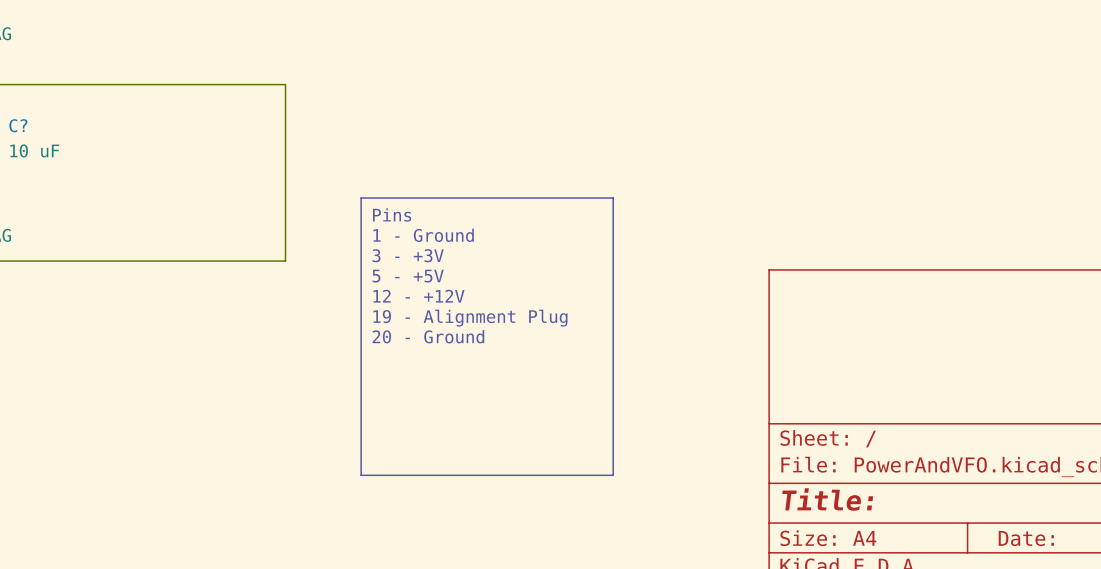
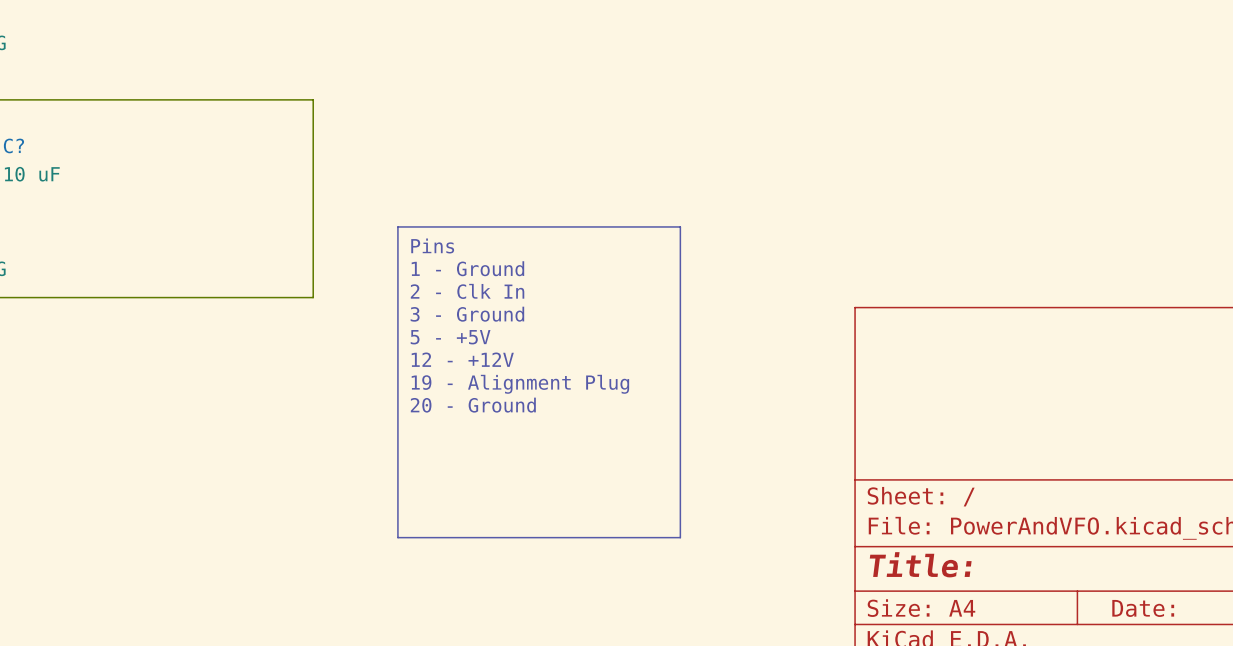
text: 3 - +3V (408, 255) -> 2 - Clk In (467, 291)
text: 5 - +5V (408, 276) -> 3 - Ground (467, 314)
text: 12 - +12V (418, 296) -> 5 - +5V (450, 337)
text: 19 - Alignment Plug (470, 318) -> 12 - +12V (462, 359)
text: 20 - Ground (428, 336) -> 19 - Alignment Plug (520, 384)
text: none -> 20 - Ground (473, 405)

